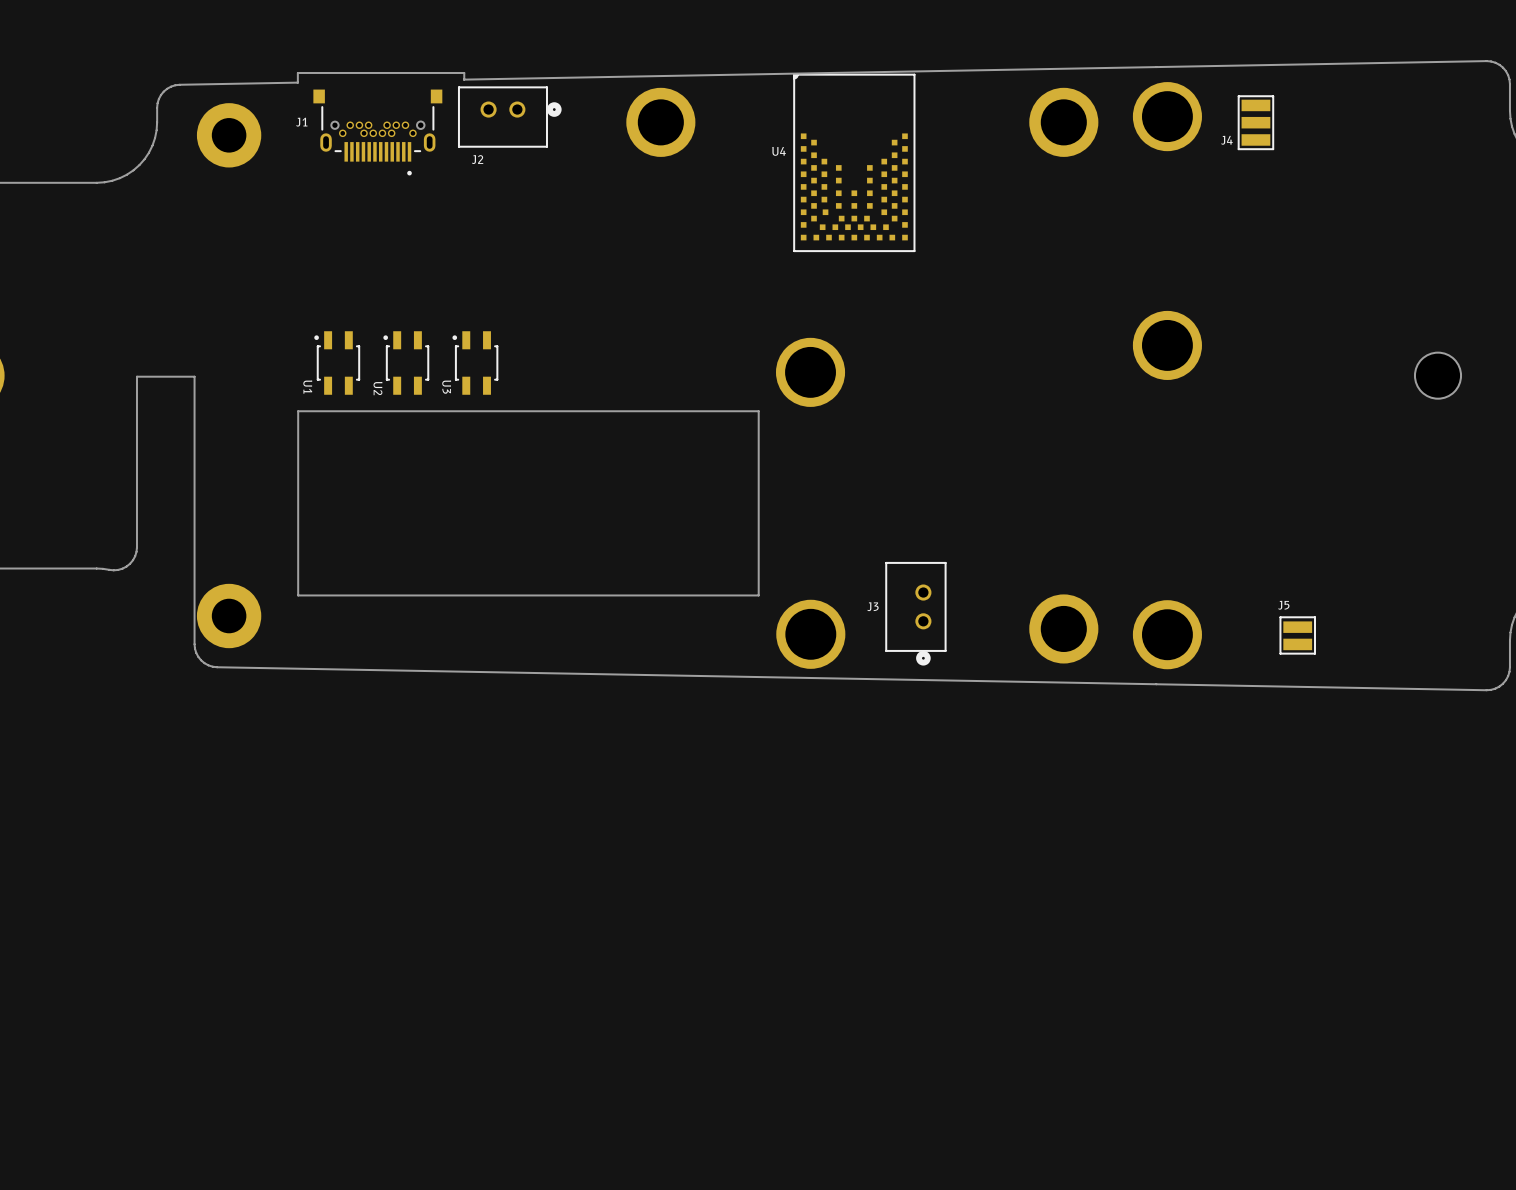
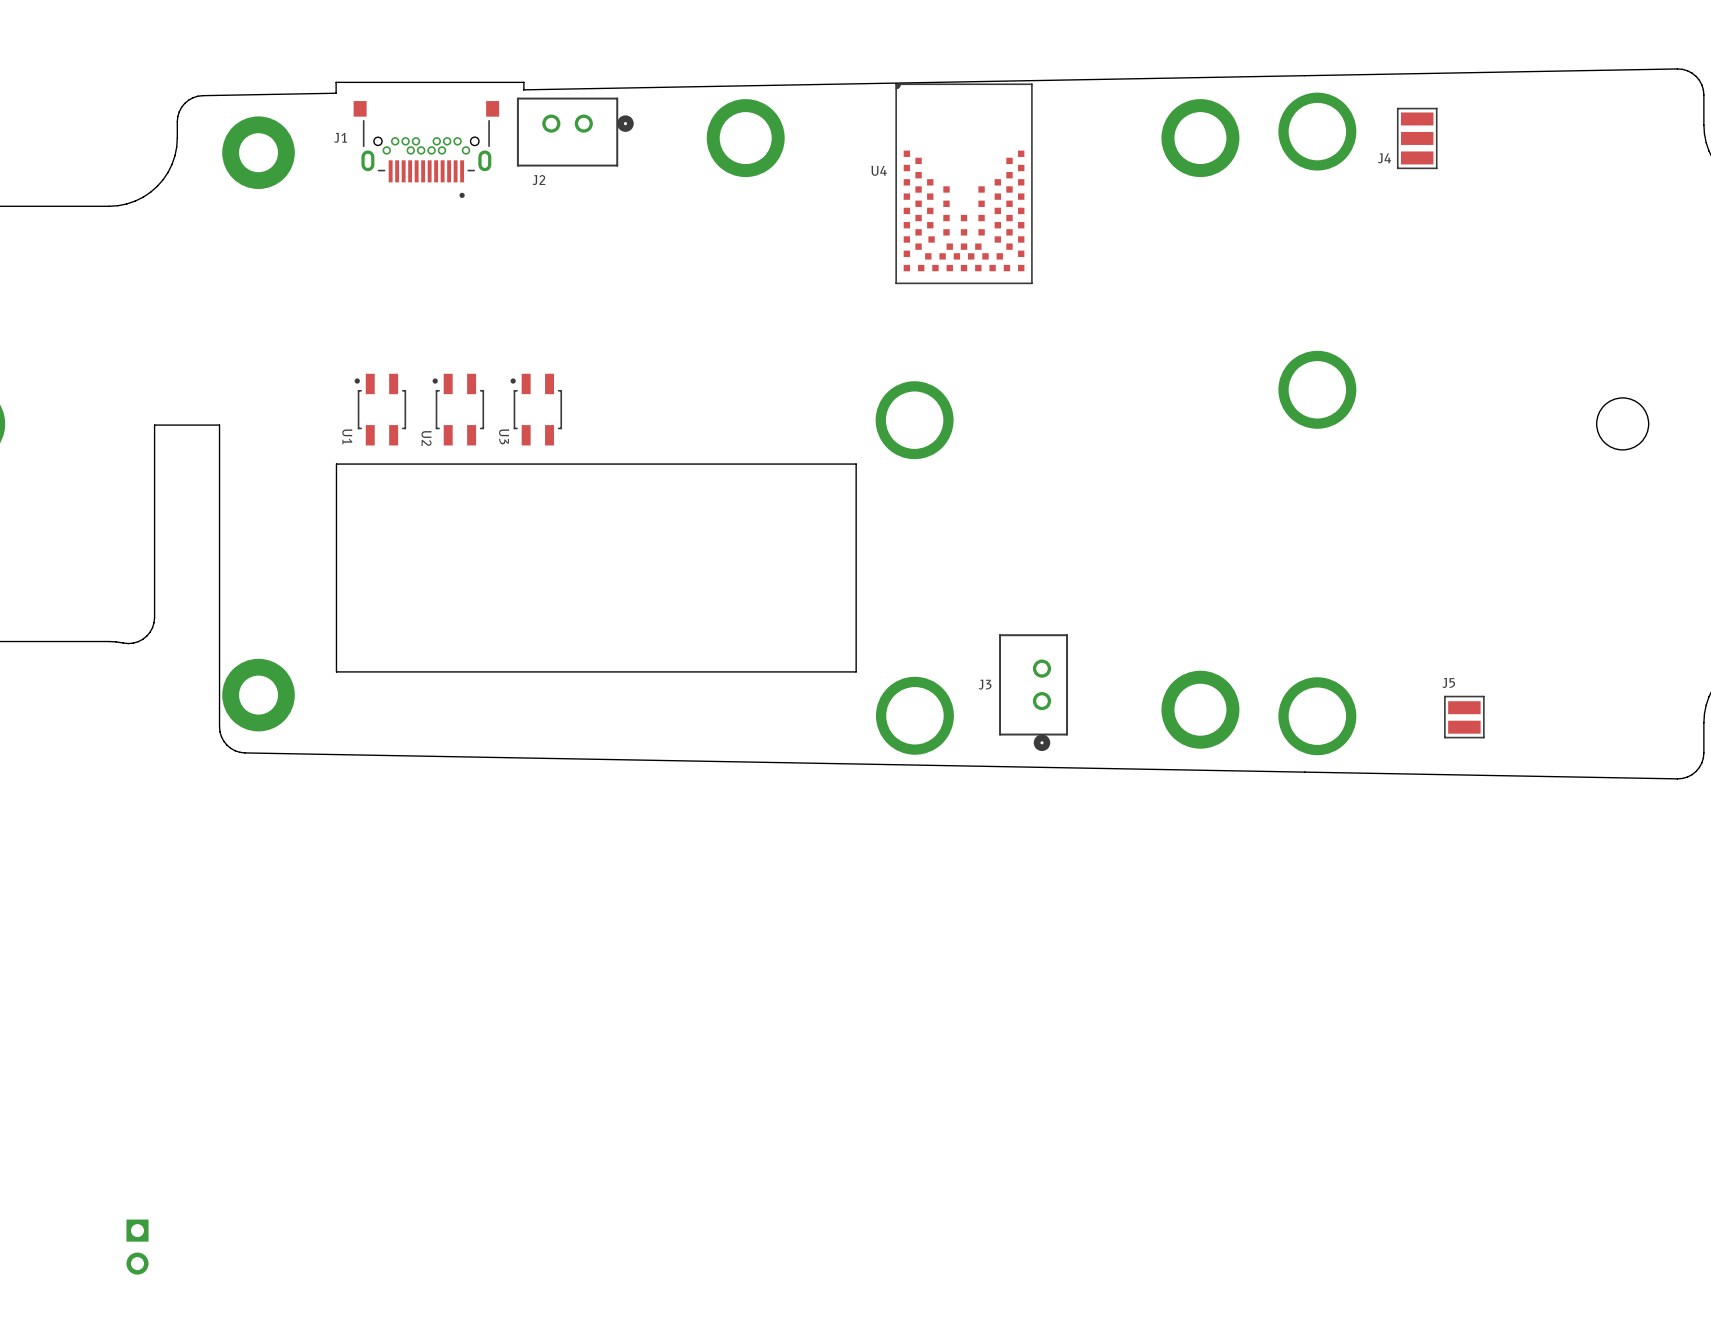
part: none -> (137, 1247)

